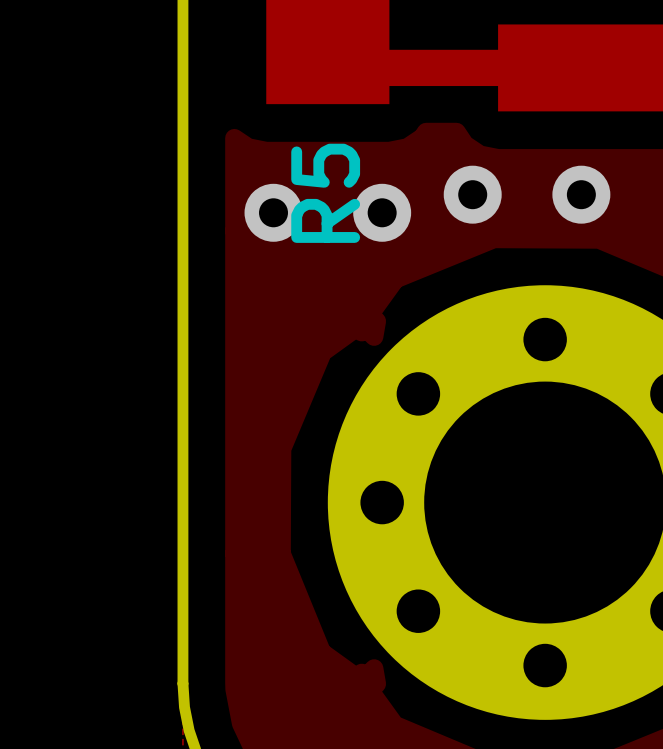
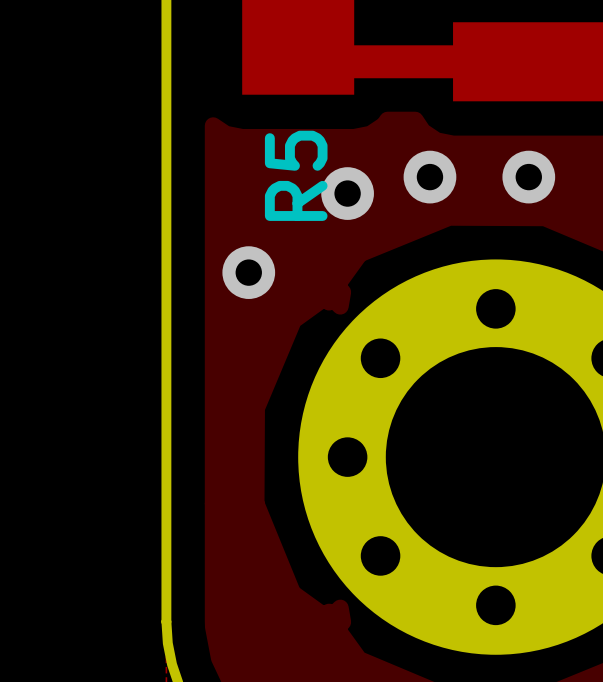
via position: (273, 212) -> (248, 272)

